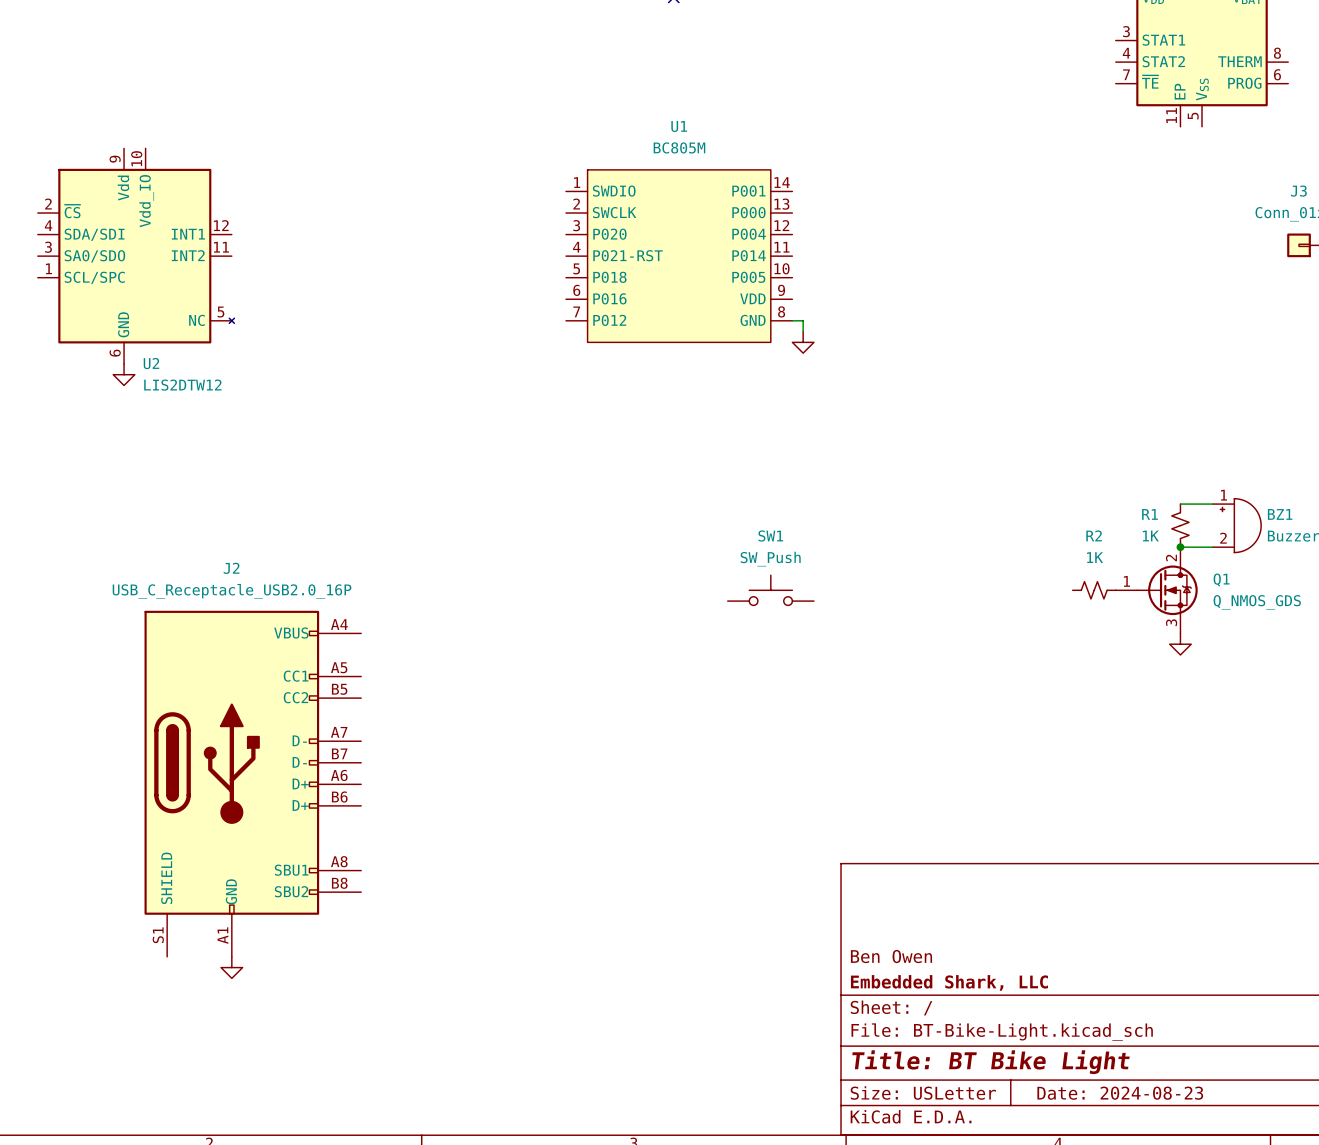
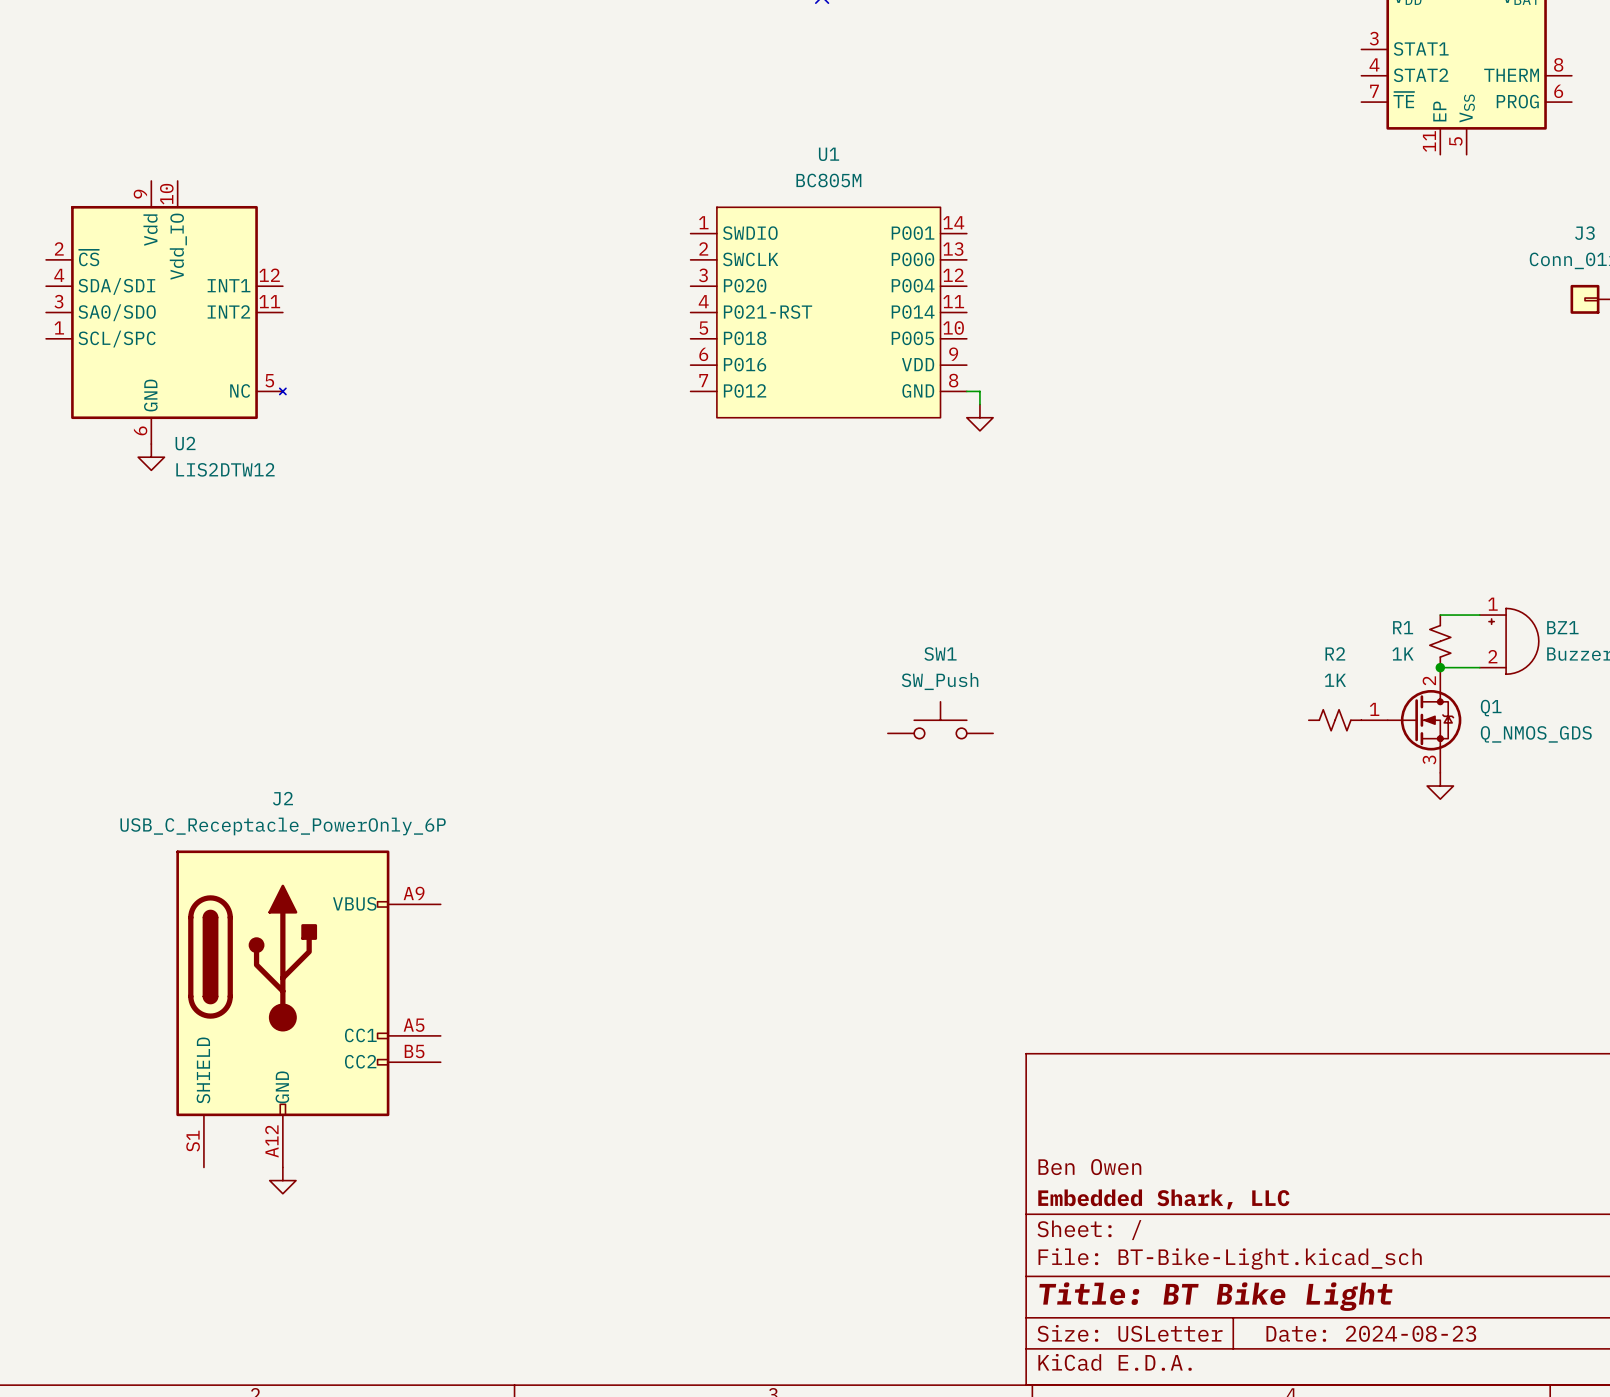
J2 name position: J2 (231, 568) -> J2 (282, 798)
J2 value: USB_C_Receptacle_USB2.0_16P (232, 591) -> USB_C_Receptacle_PowerOnly_6P (283, 826)
J2 symbol: [144, 610, 362, 957] -> [176, 850, 441, 1168]

